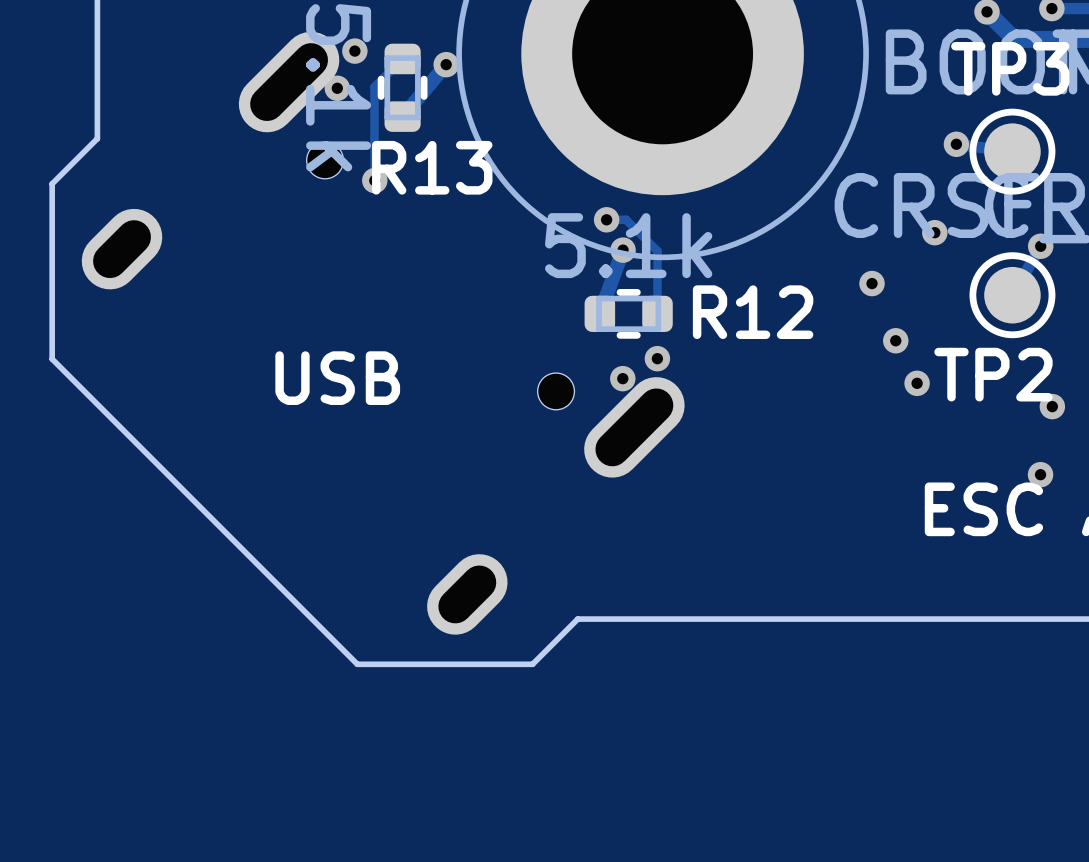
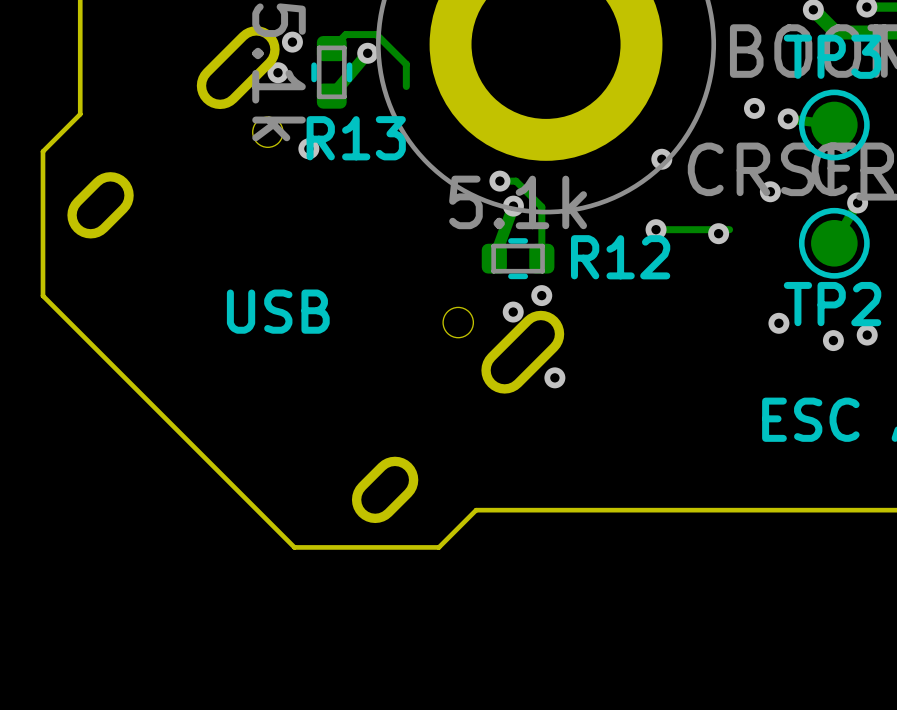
track: (402, 58) (374, 87) (374, 180) -> (331, 48) (345, 34) (376, 34) (406, 64) (406, 86)
via: none -> (754, 108)
via: none -> (661, 159)
via: none -> (656, 229)
track: none -> (729, 229) (656, 229)
via: (895, 340) -> none
TP2 name position: TP2 (993, 374) -> TP2 (832, 304)
via position: (917, 383) -> (778, 323)
via: none -> (833, 340)
via: none -> (554, 377)
via: (1040, 474) -> none

